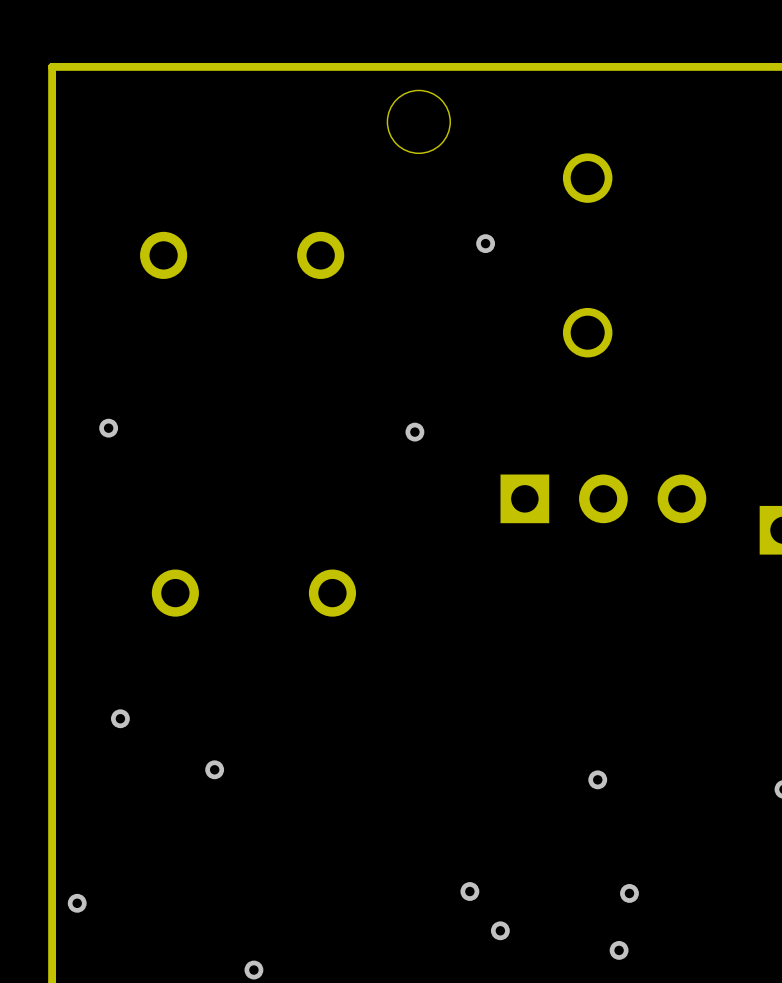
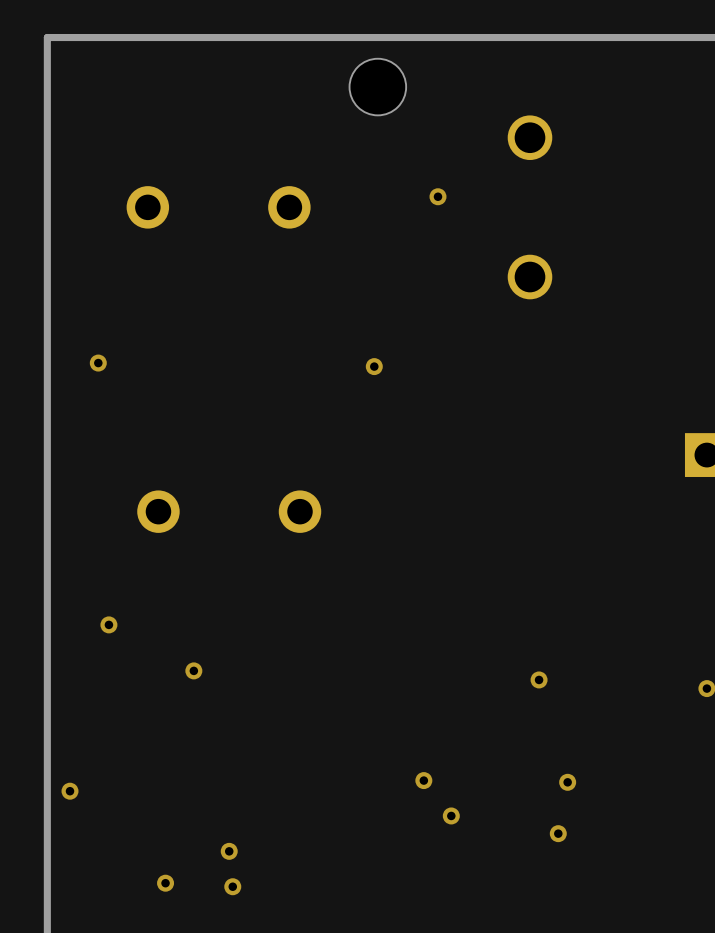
part: (603, 498) -> none

